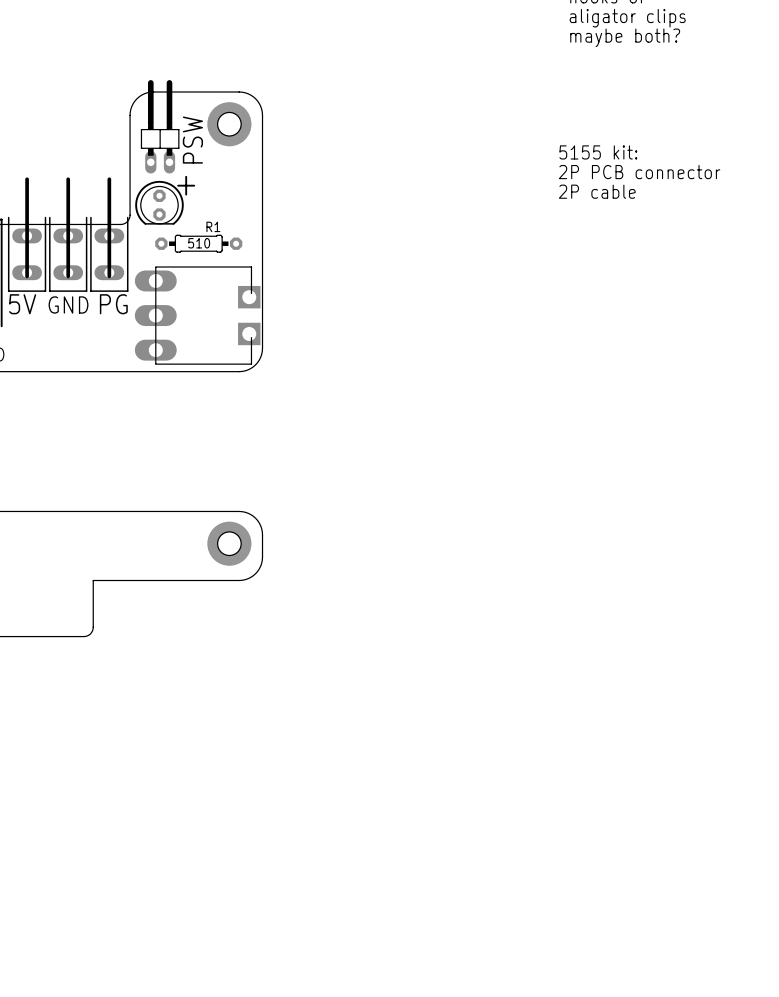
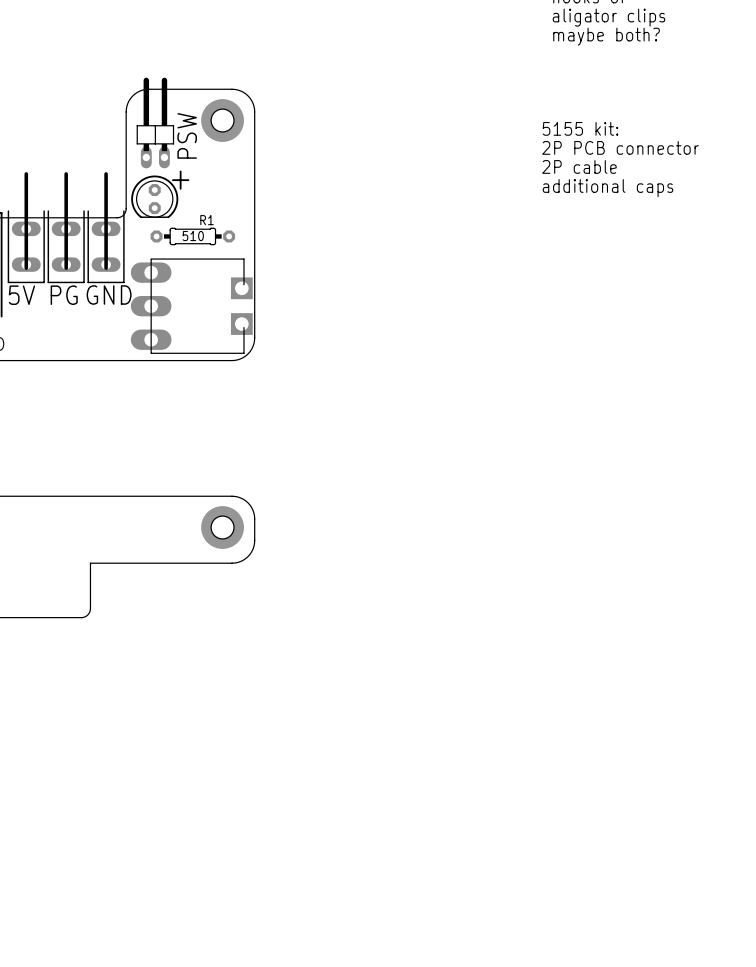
text: none -> 5155 kit: (580, 128)
text: 5155 kit: (598, 152) -> 2P PCB connector (620, 147)
text: 2P PCB connector (639, 172) -> 2P cable (579, 166)
text: 2P cable (597, 191) -> additional caps (608, 188)
text: GND (68, 304) -> PG (64, 295)
text: PG (113, 304) -> GND (109, 295)

